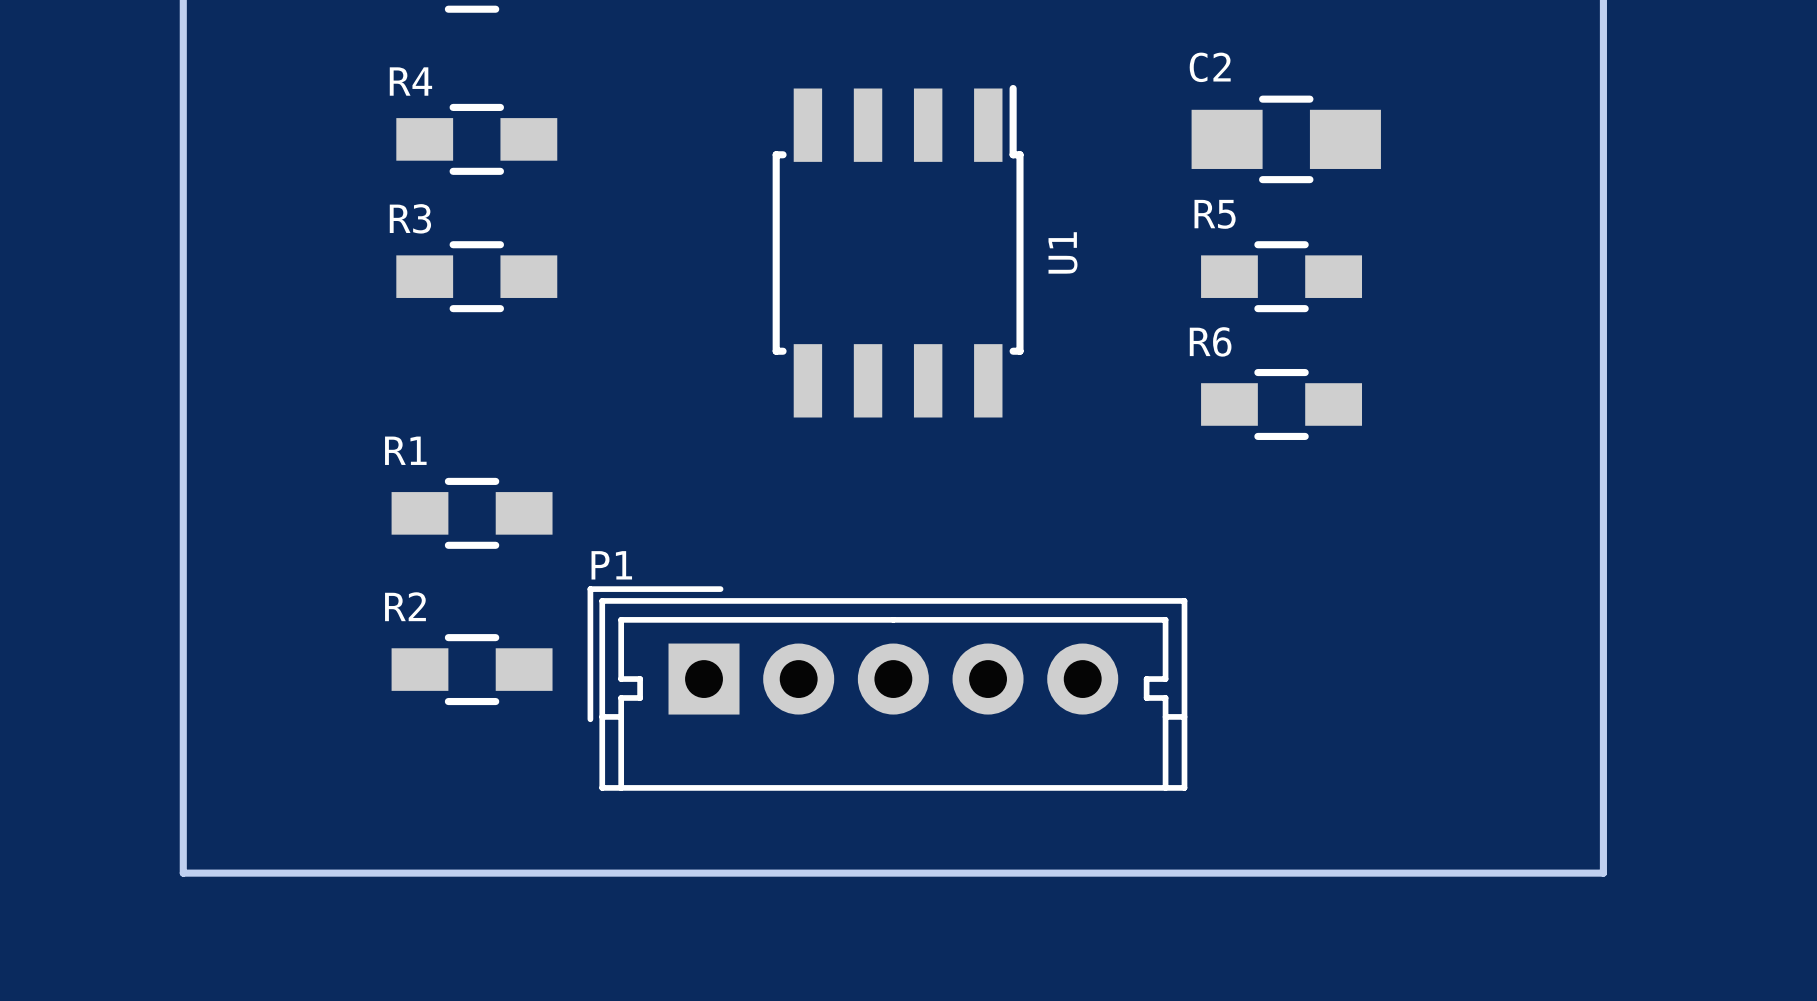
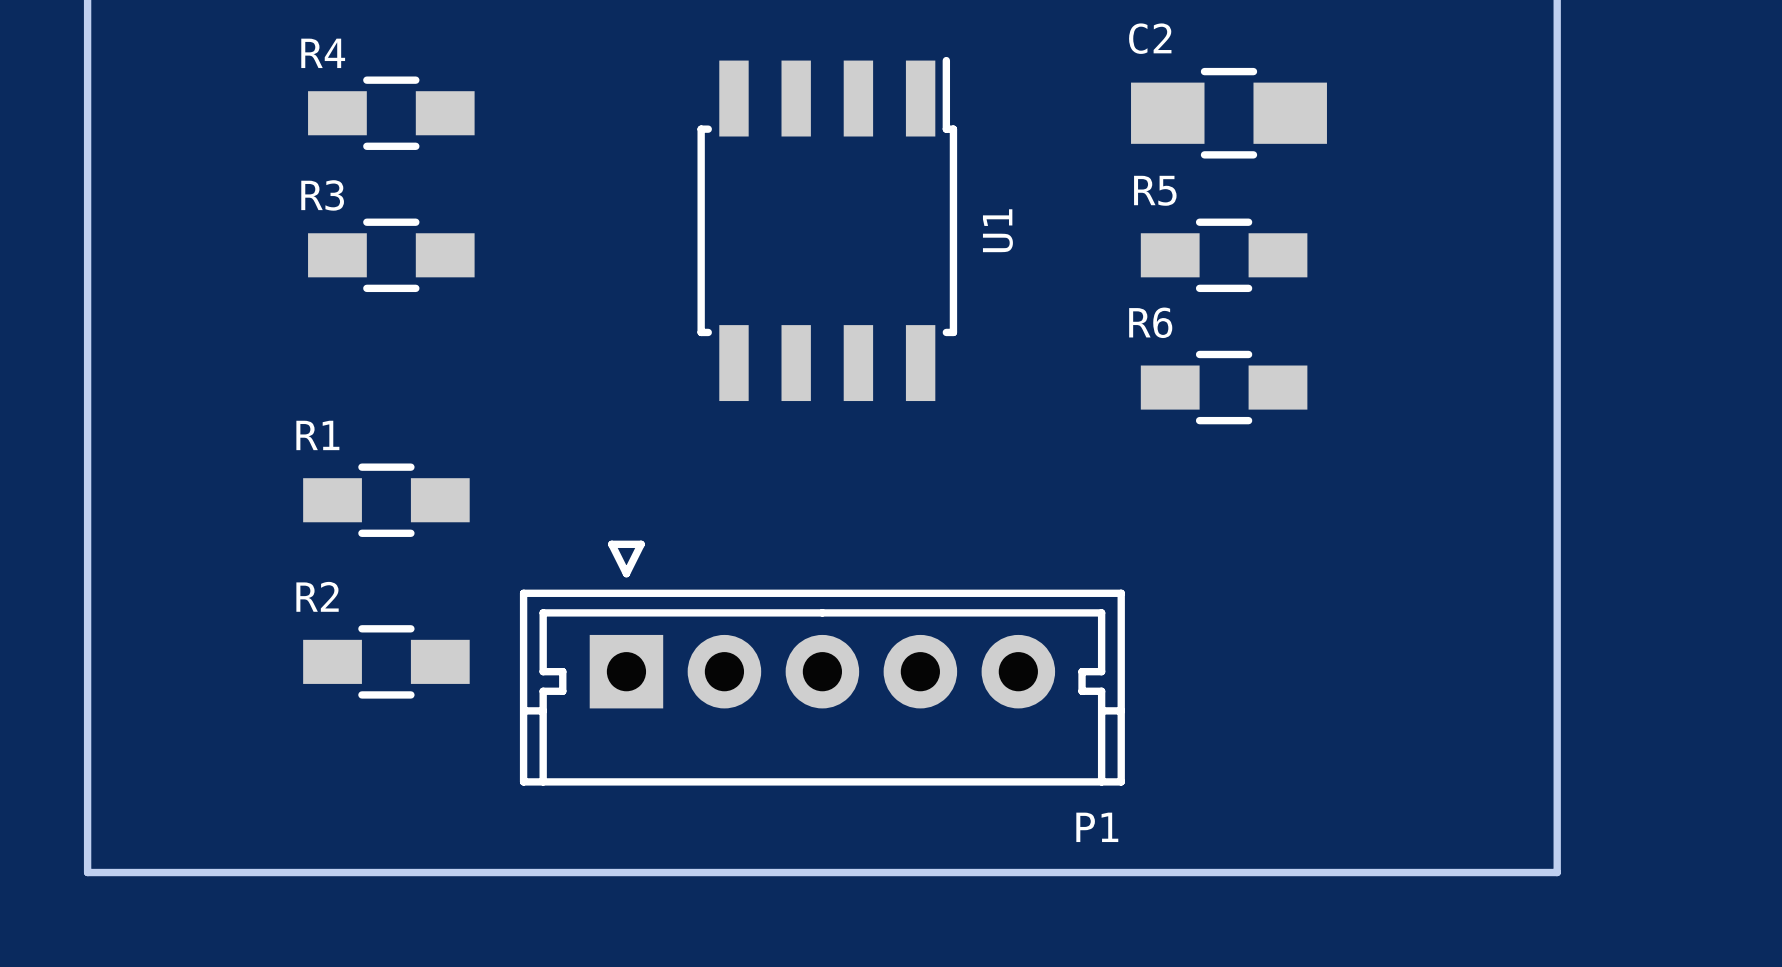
P1 name position: P1 (611, 565) -> P1 (1097, 827)
P1 footprint: [587, 586, 1188, 791] -> [519, 540, 1125, 786]

